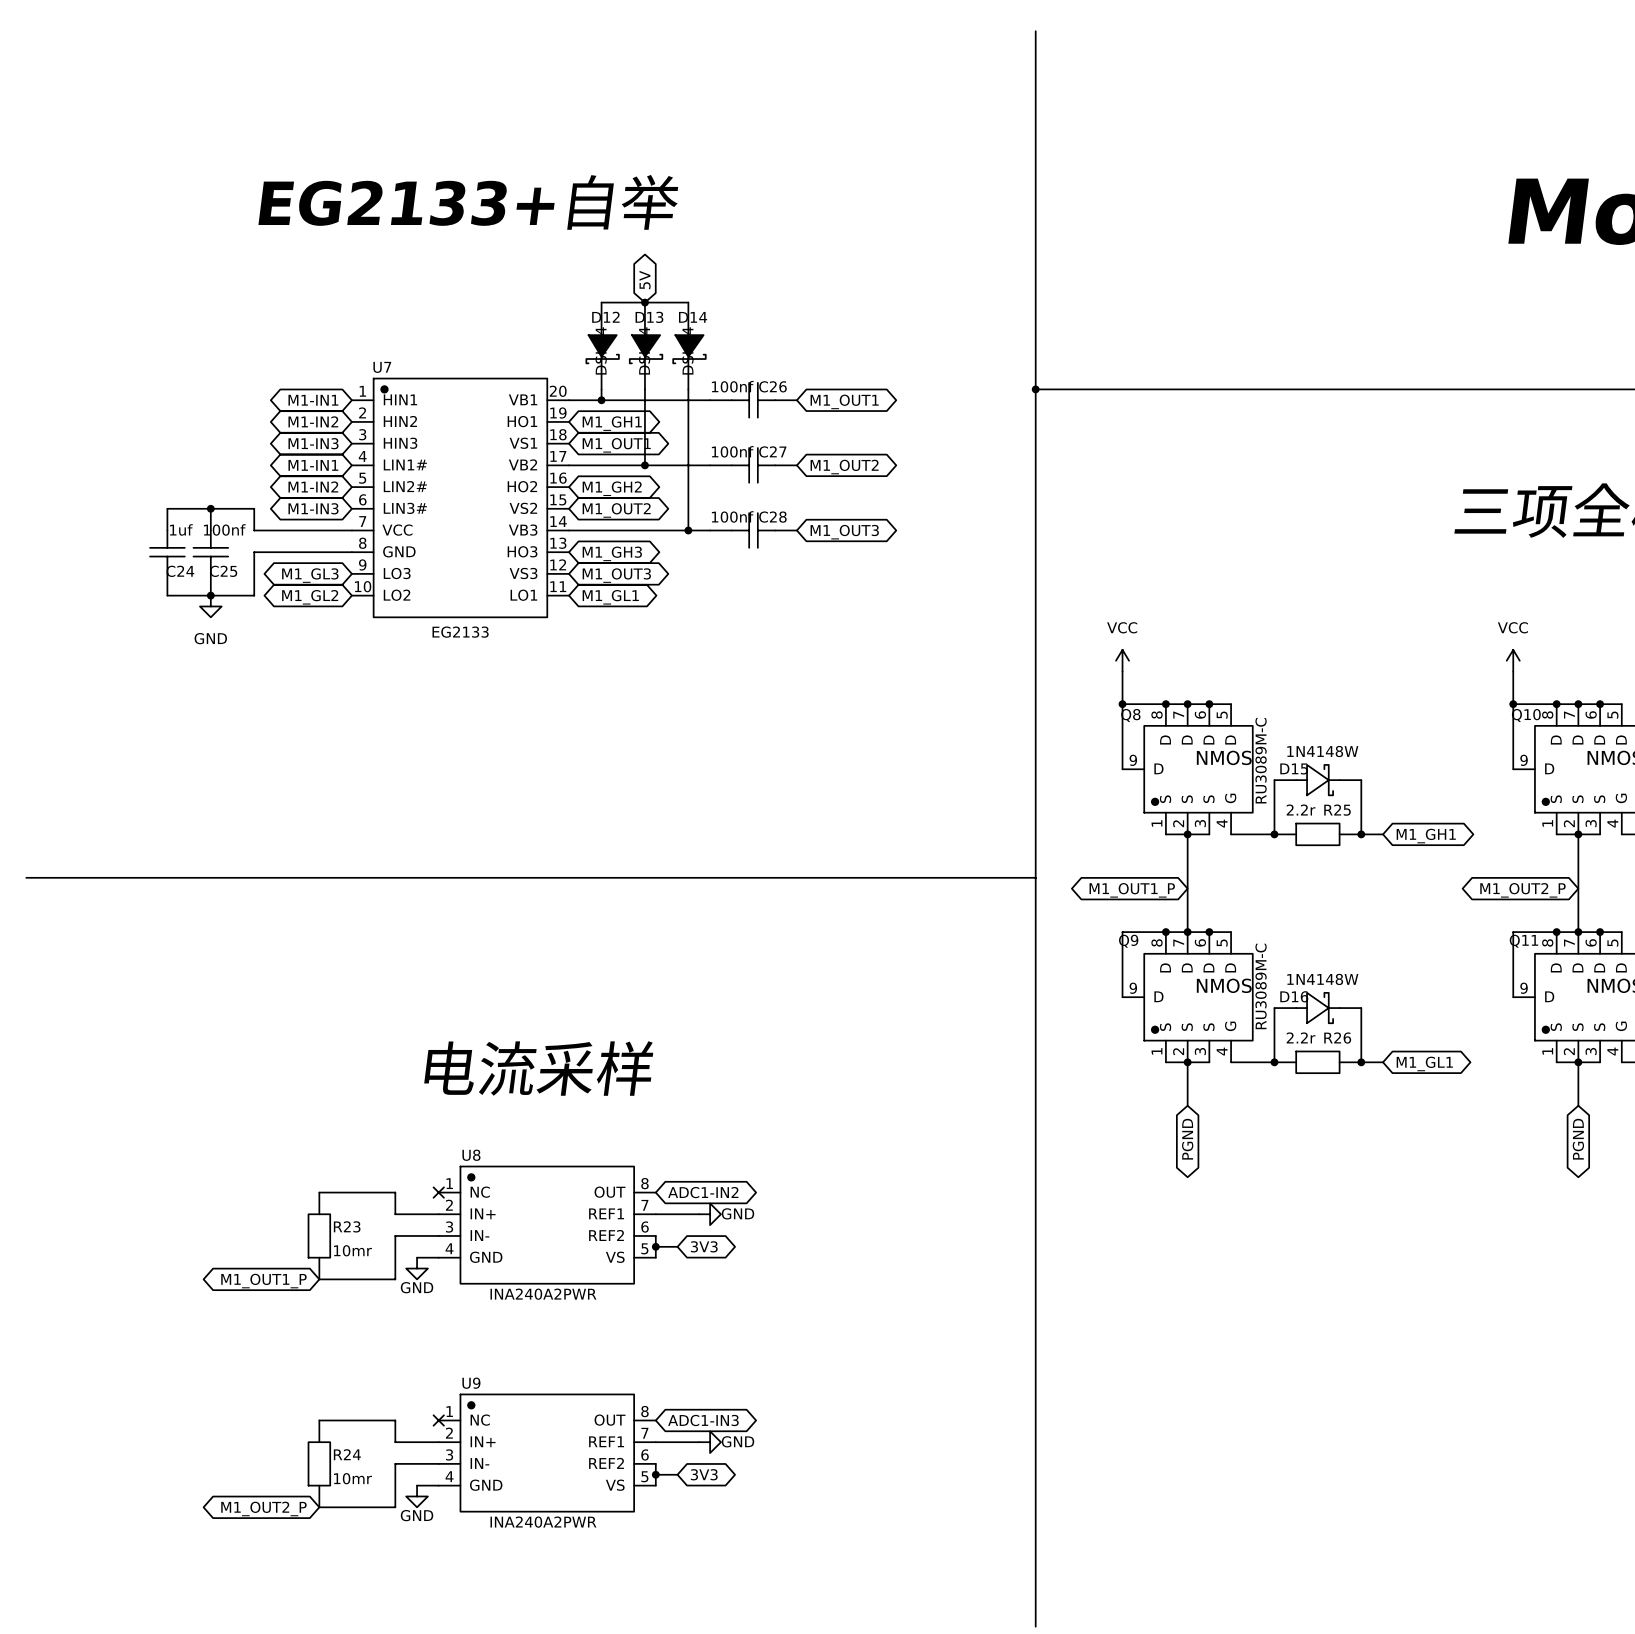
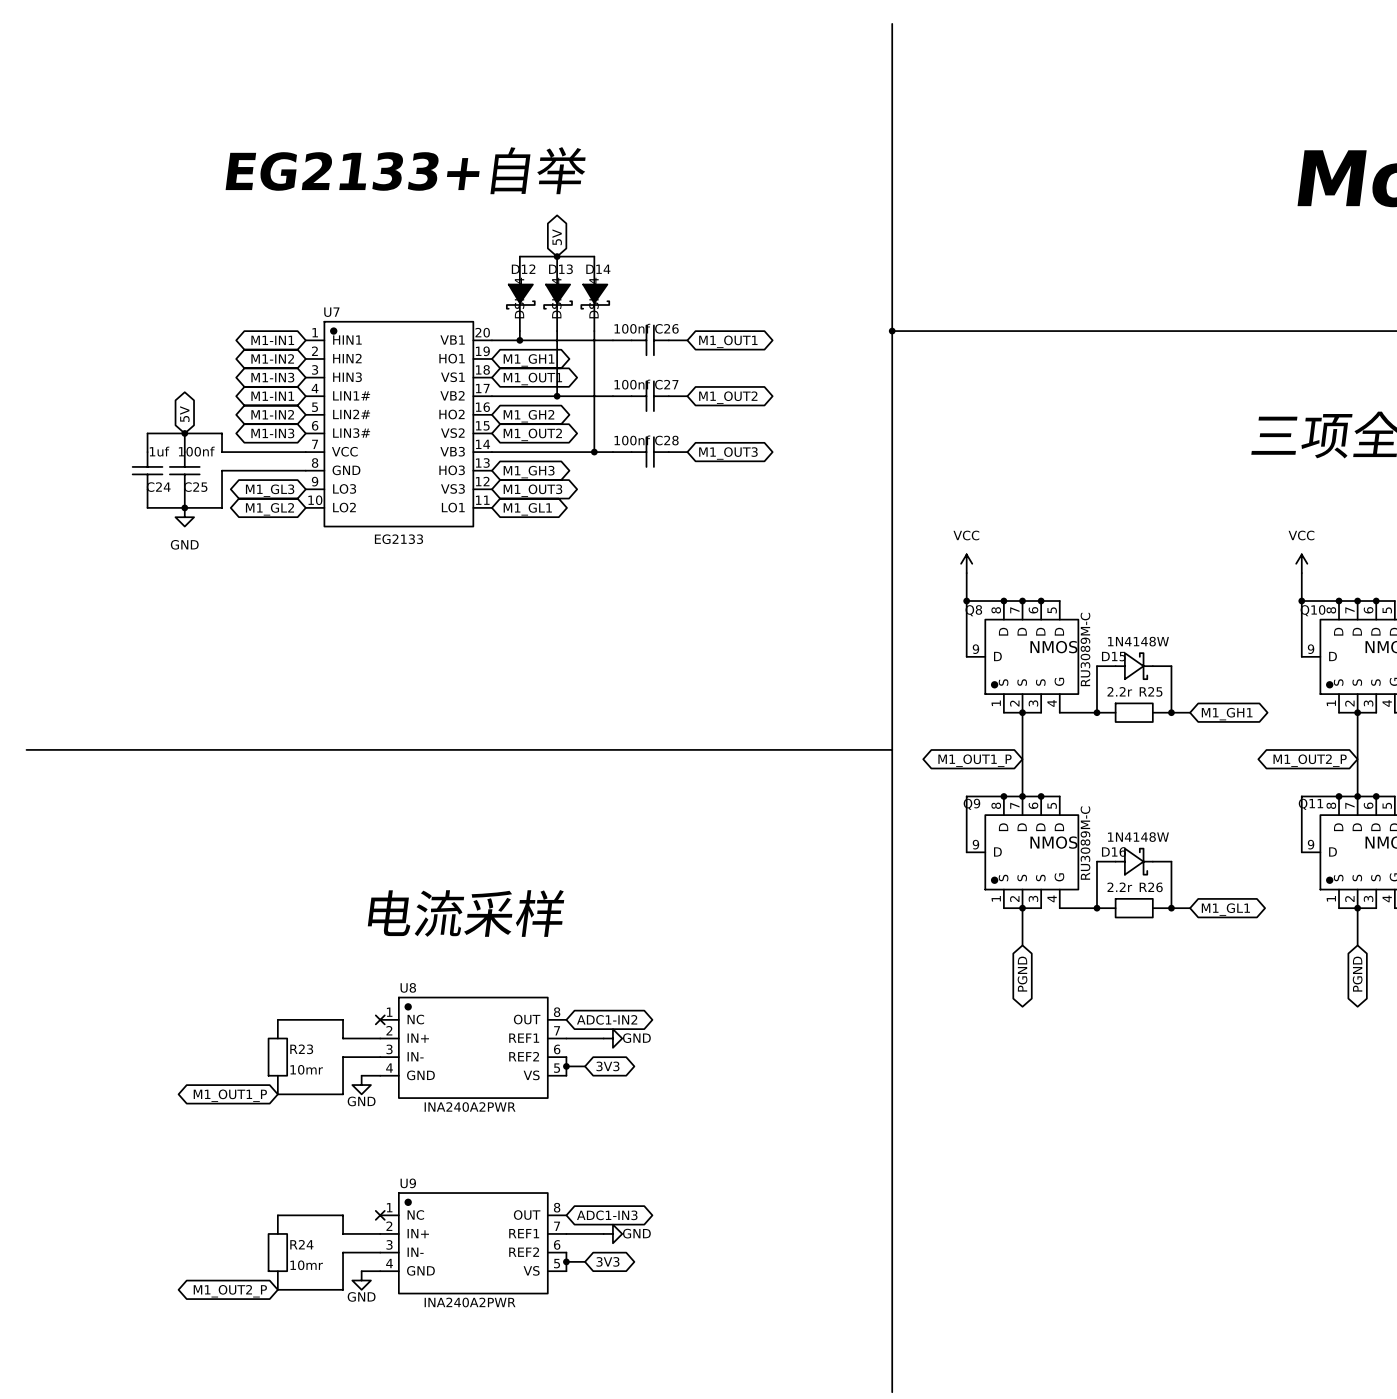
global label: none -> 5V (184, 414)

